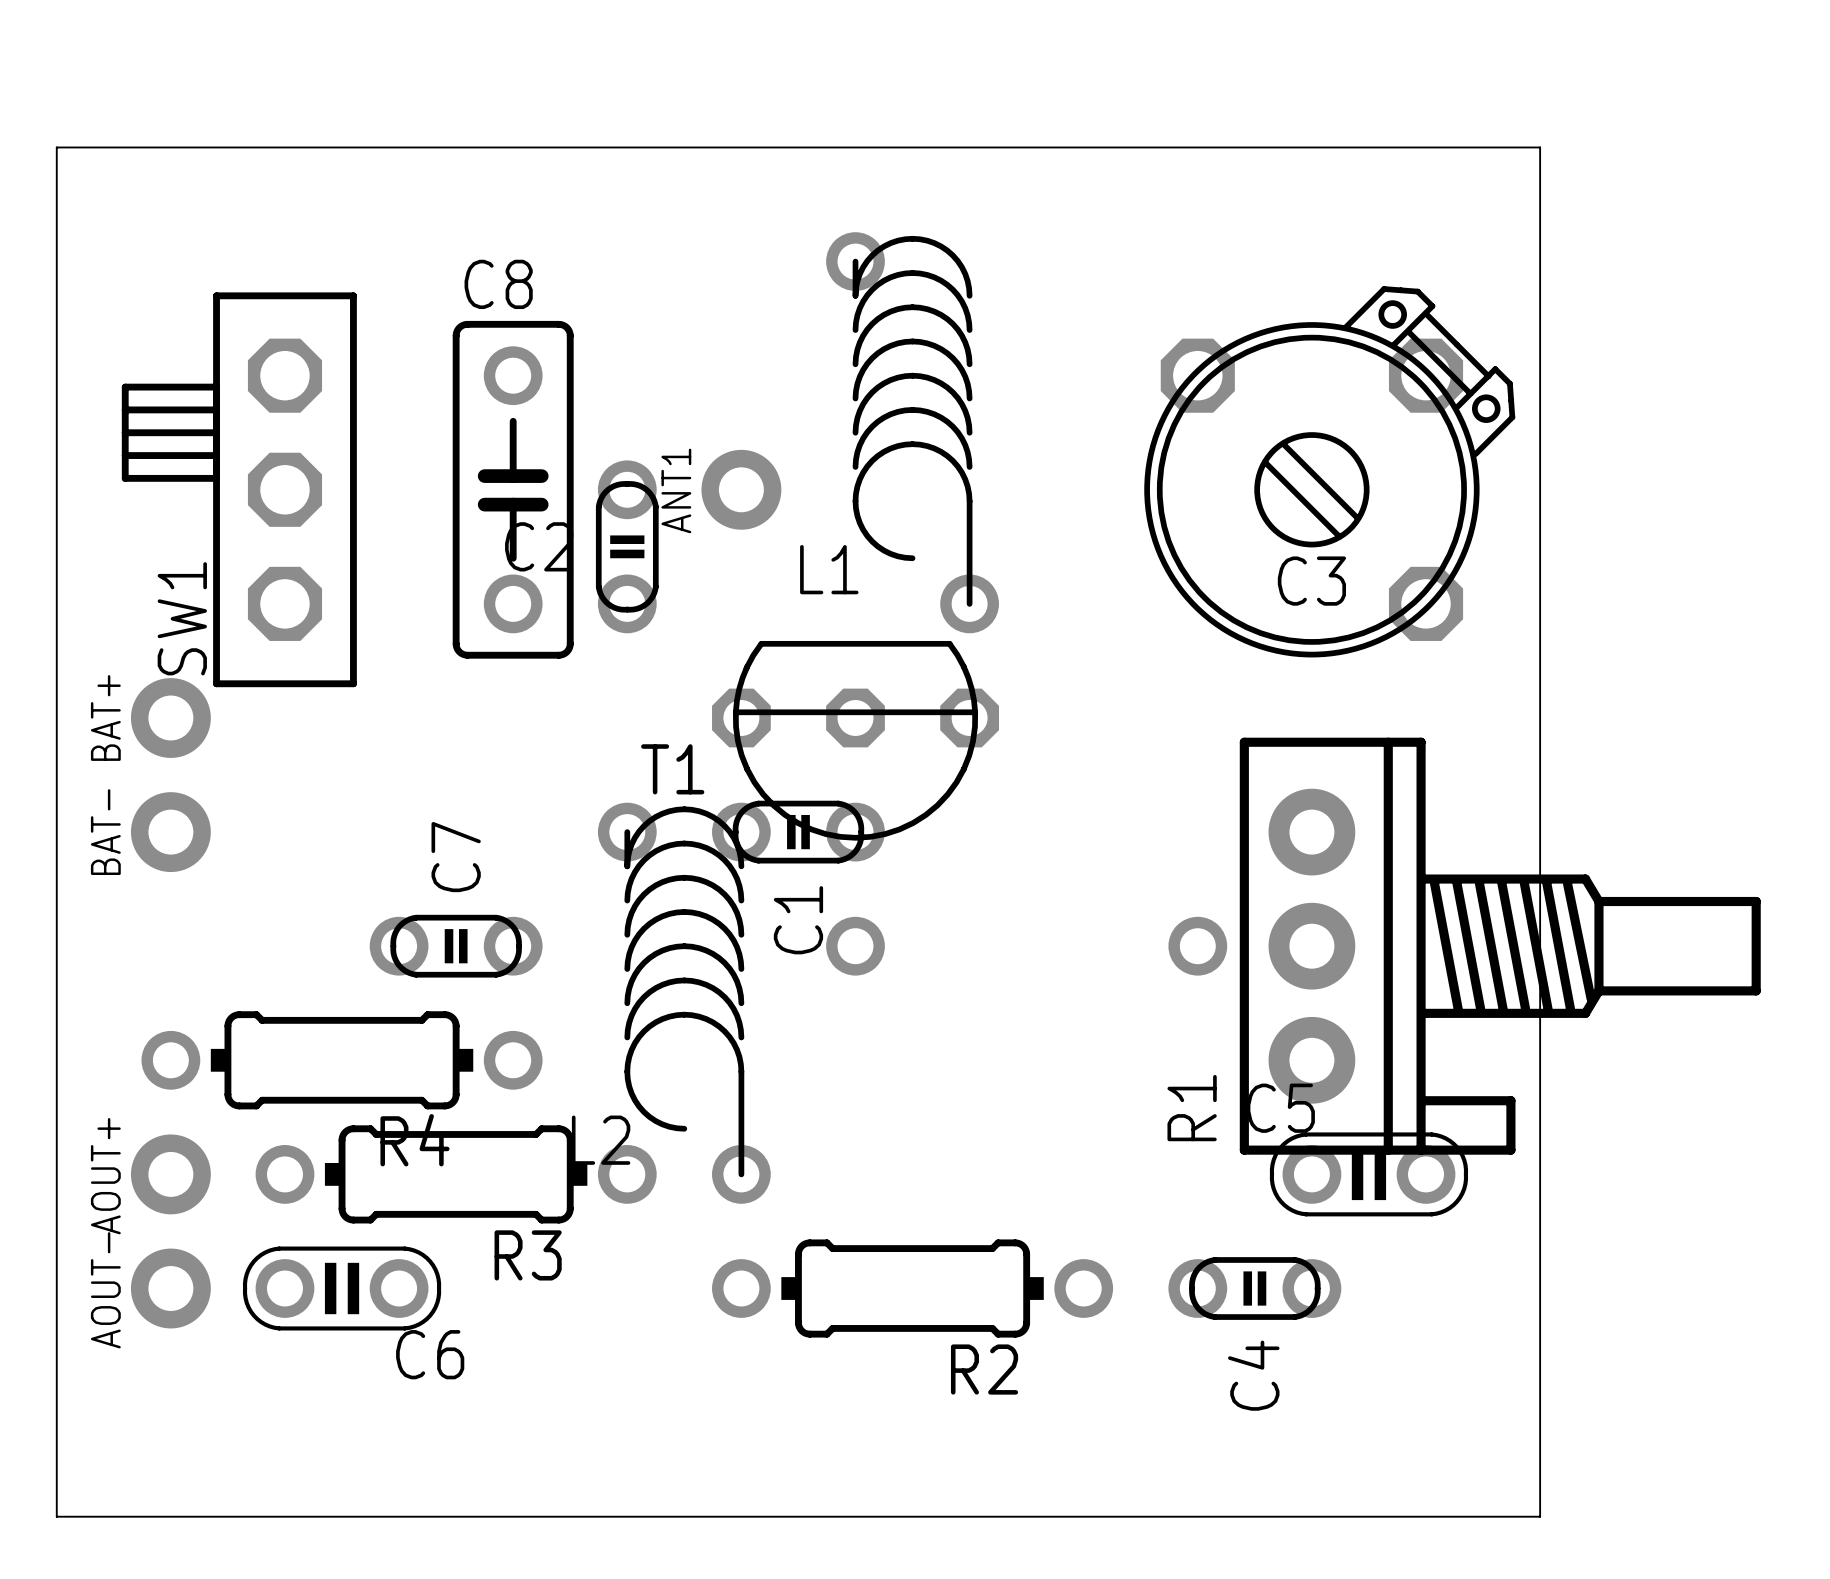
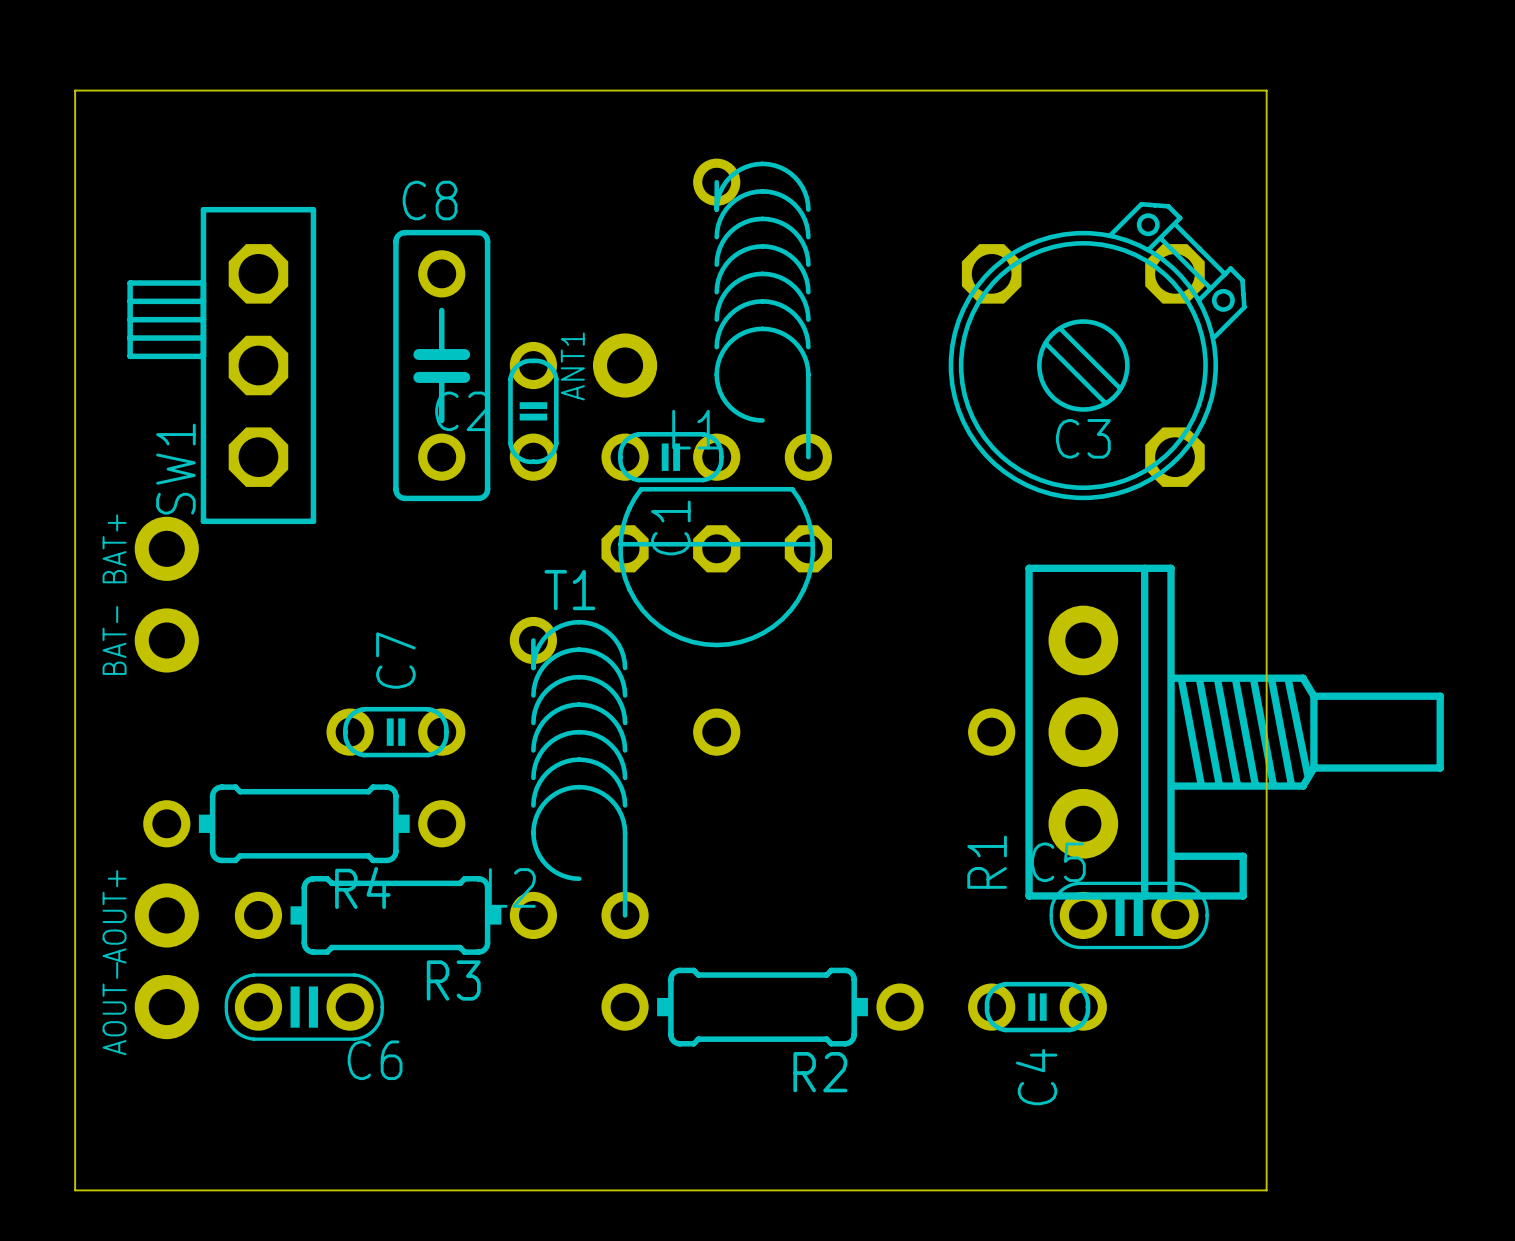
C1 position: (798, 832) -> (670, 457)

